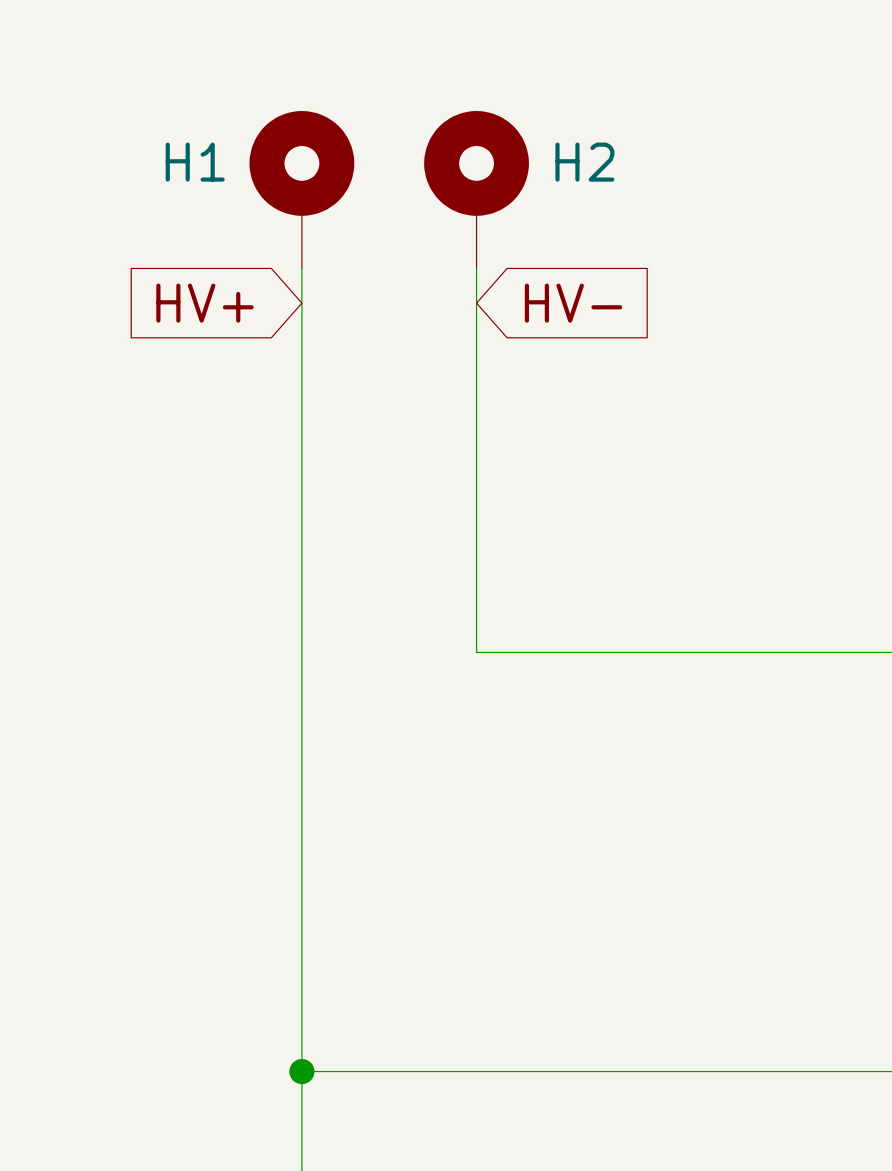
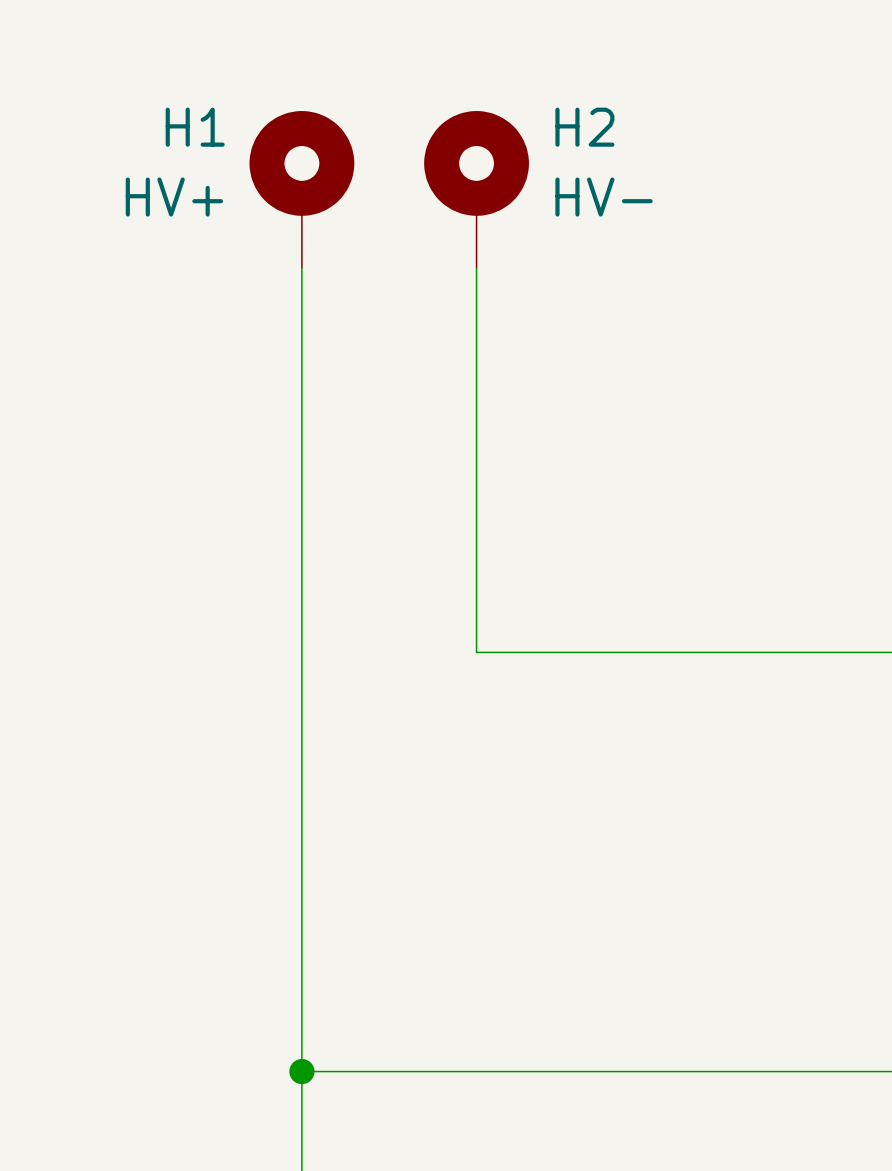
H1 name position: H1 (195, 162) -> H1 (195, 127)
H2 name position: H2 (584, 162) -> H2 (584, 127)
H1 value: none -> HV+ (174, 197)
H2 value: none -> HV- (604, 197)
global label: HV+ (204, 303) -> none
global label: HV- (573, 303) -> none

